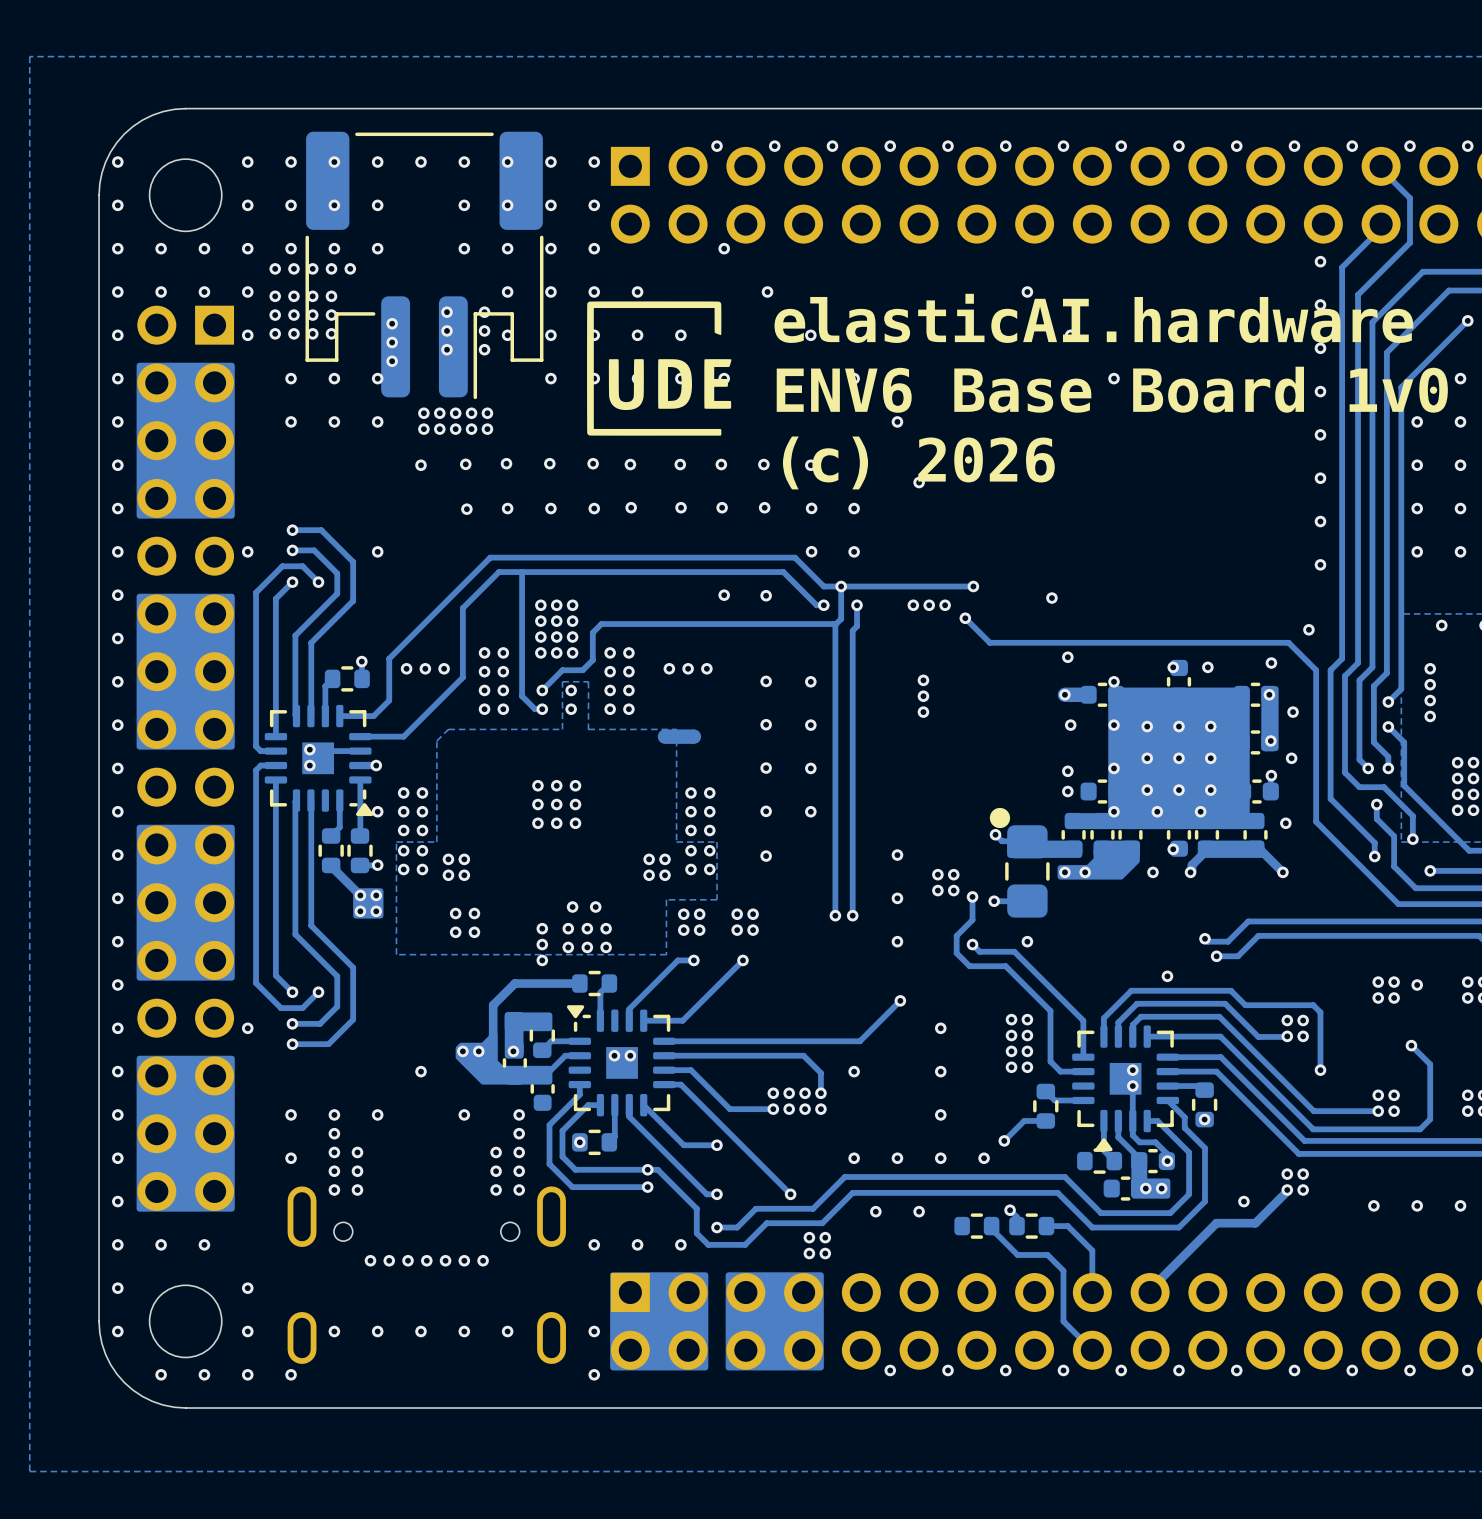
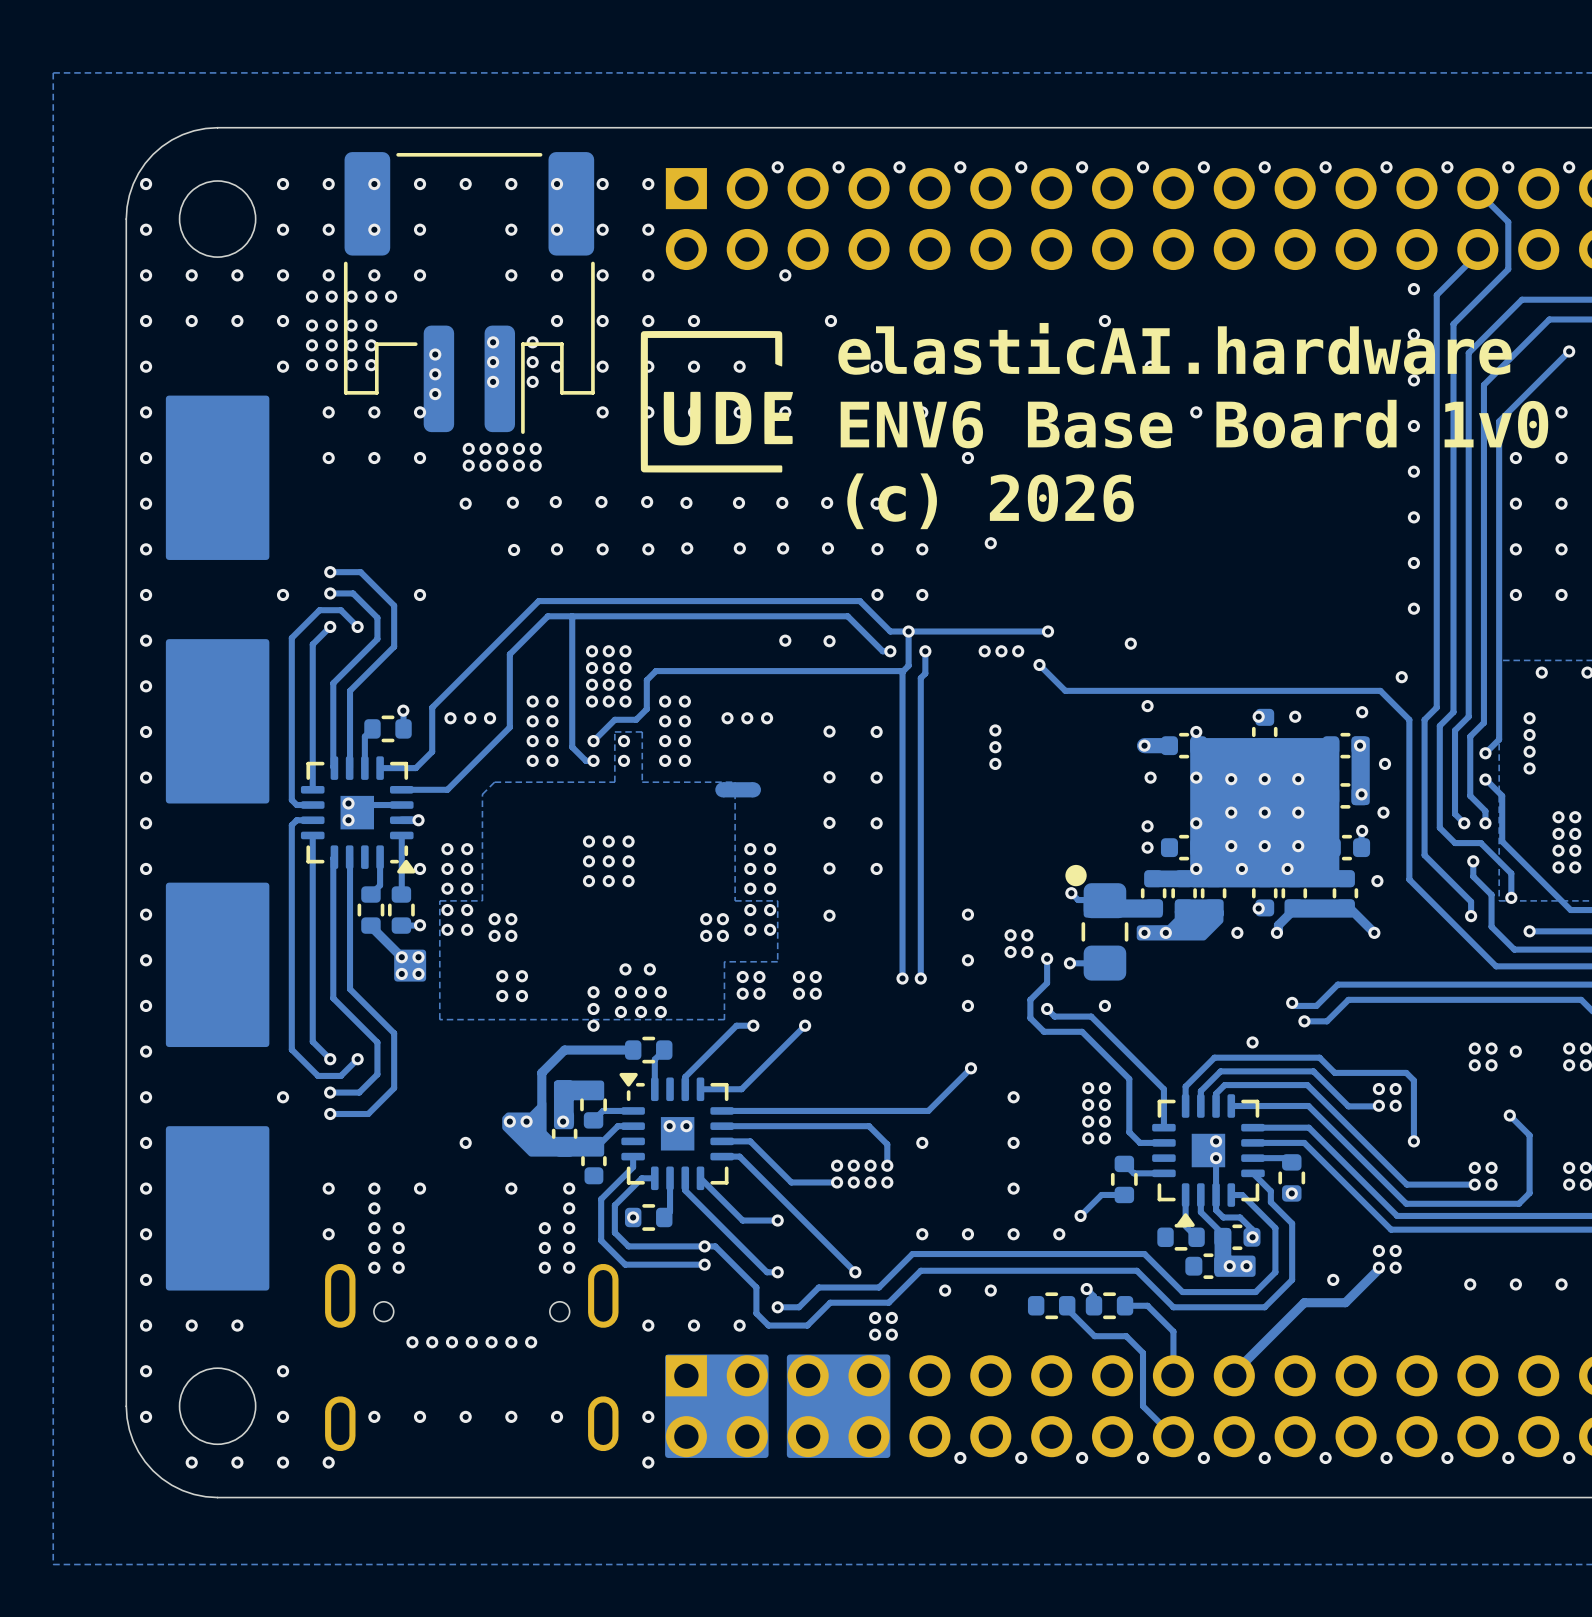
via position: (919, 482) -> (990, 543)
part: (185, 758) -> none

